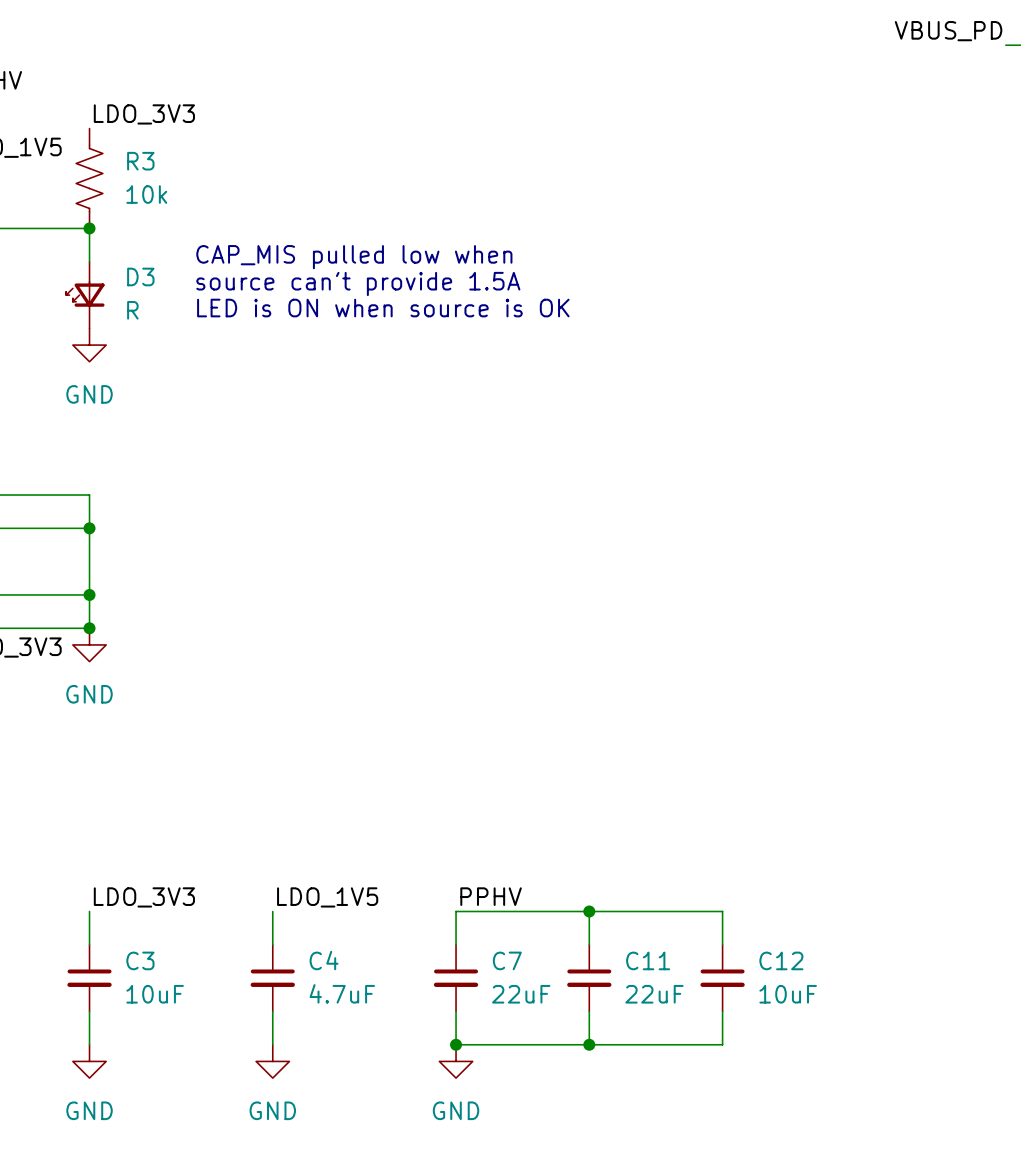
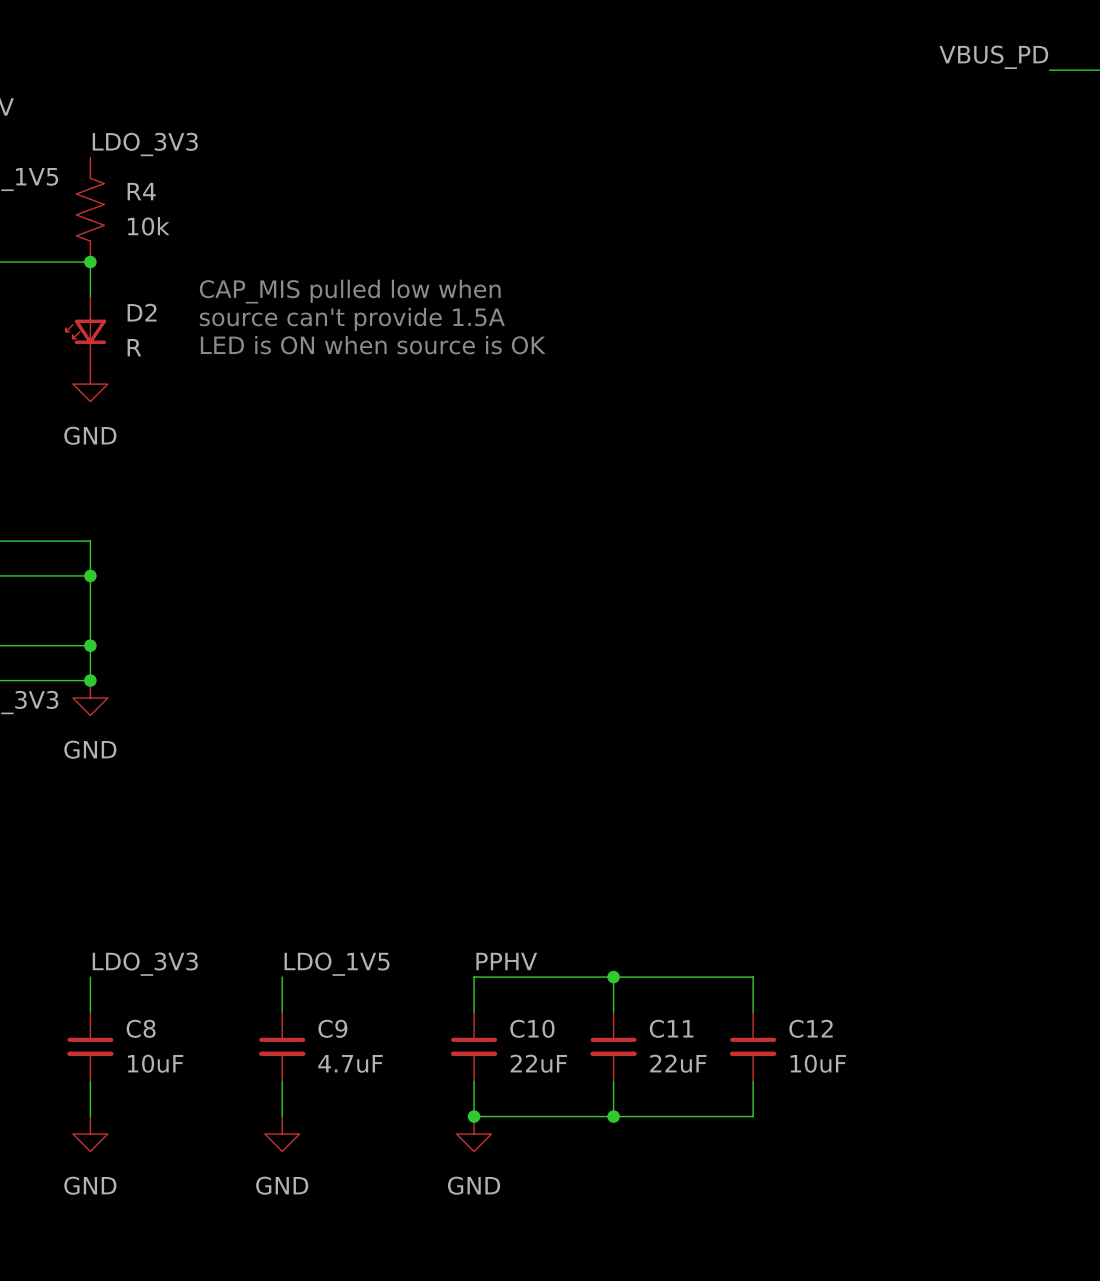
R3 name: R3 (140, 161) -> R4 (141, 191)
D3 name: D3 (140, 276) -> D2 (142, 312)
C3 name: C3 (140, 960) -> C8 (141, 1028)
C4 name: C4 (324, 960) -> C9 (332, 1028)
C7 name: C7 (507, 960) -> C10 (532, 1028)

